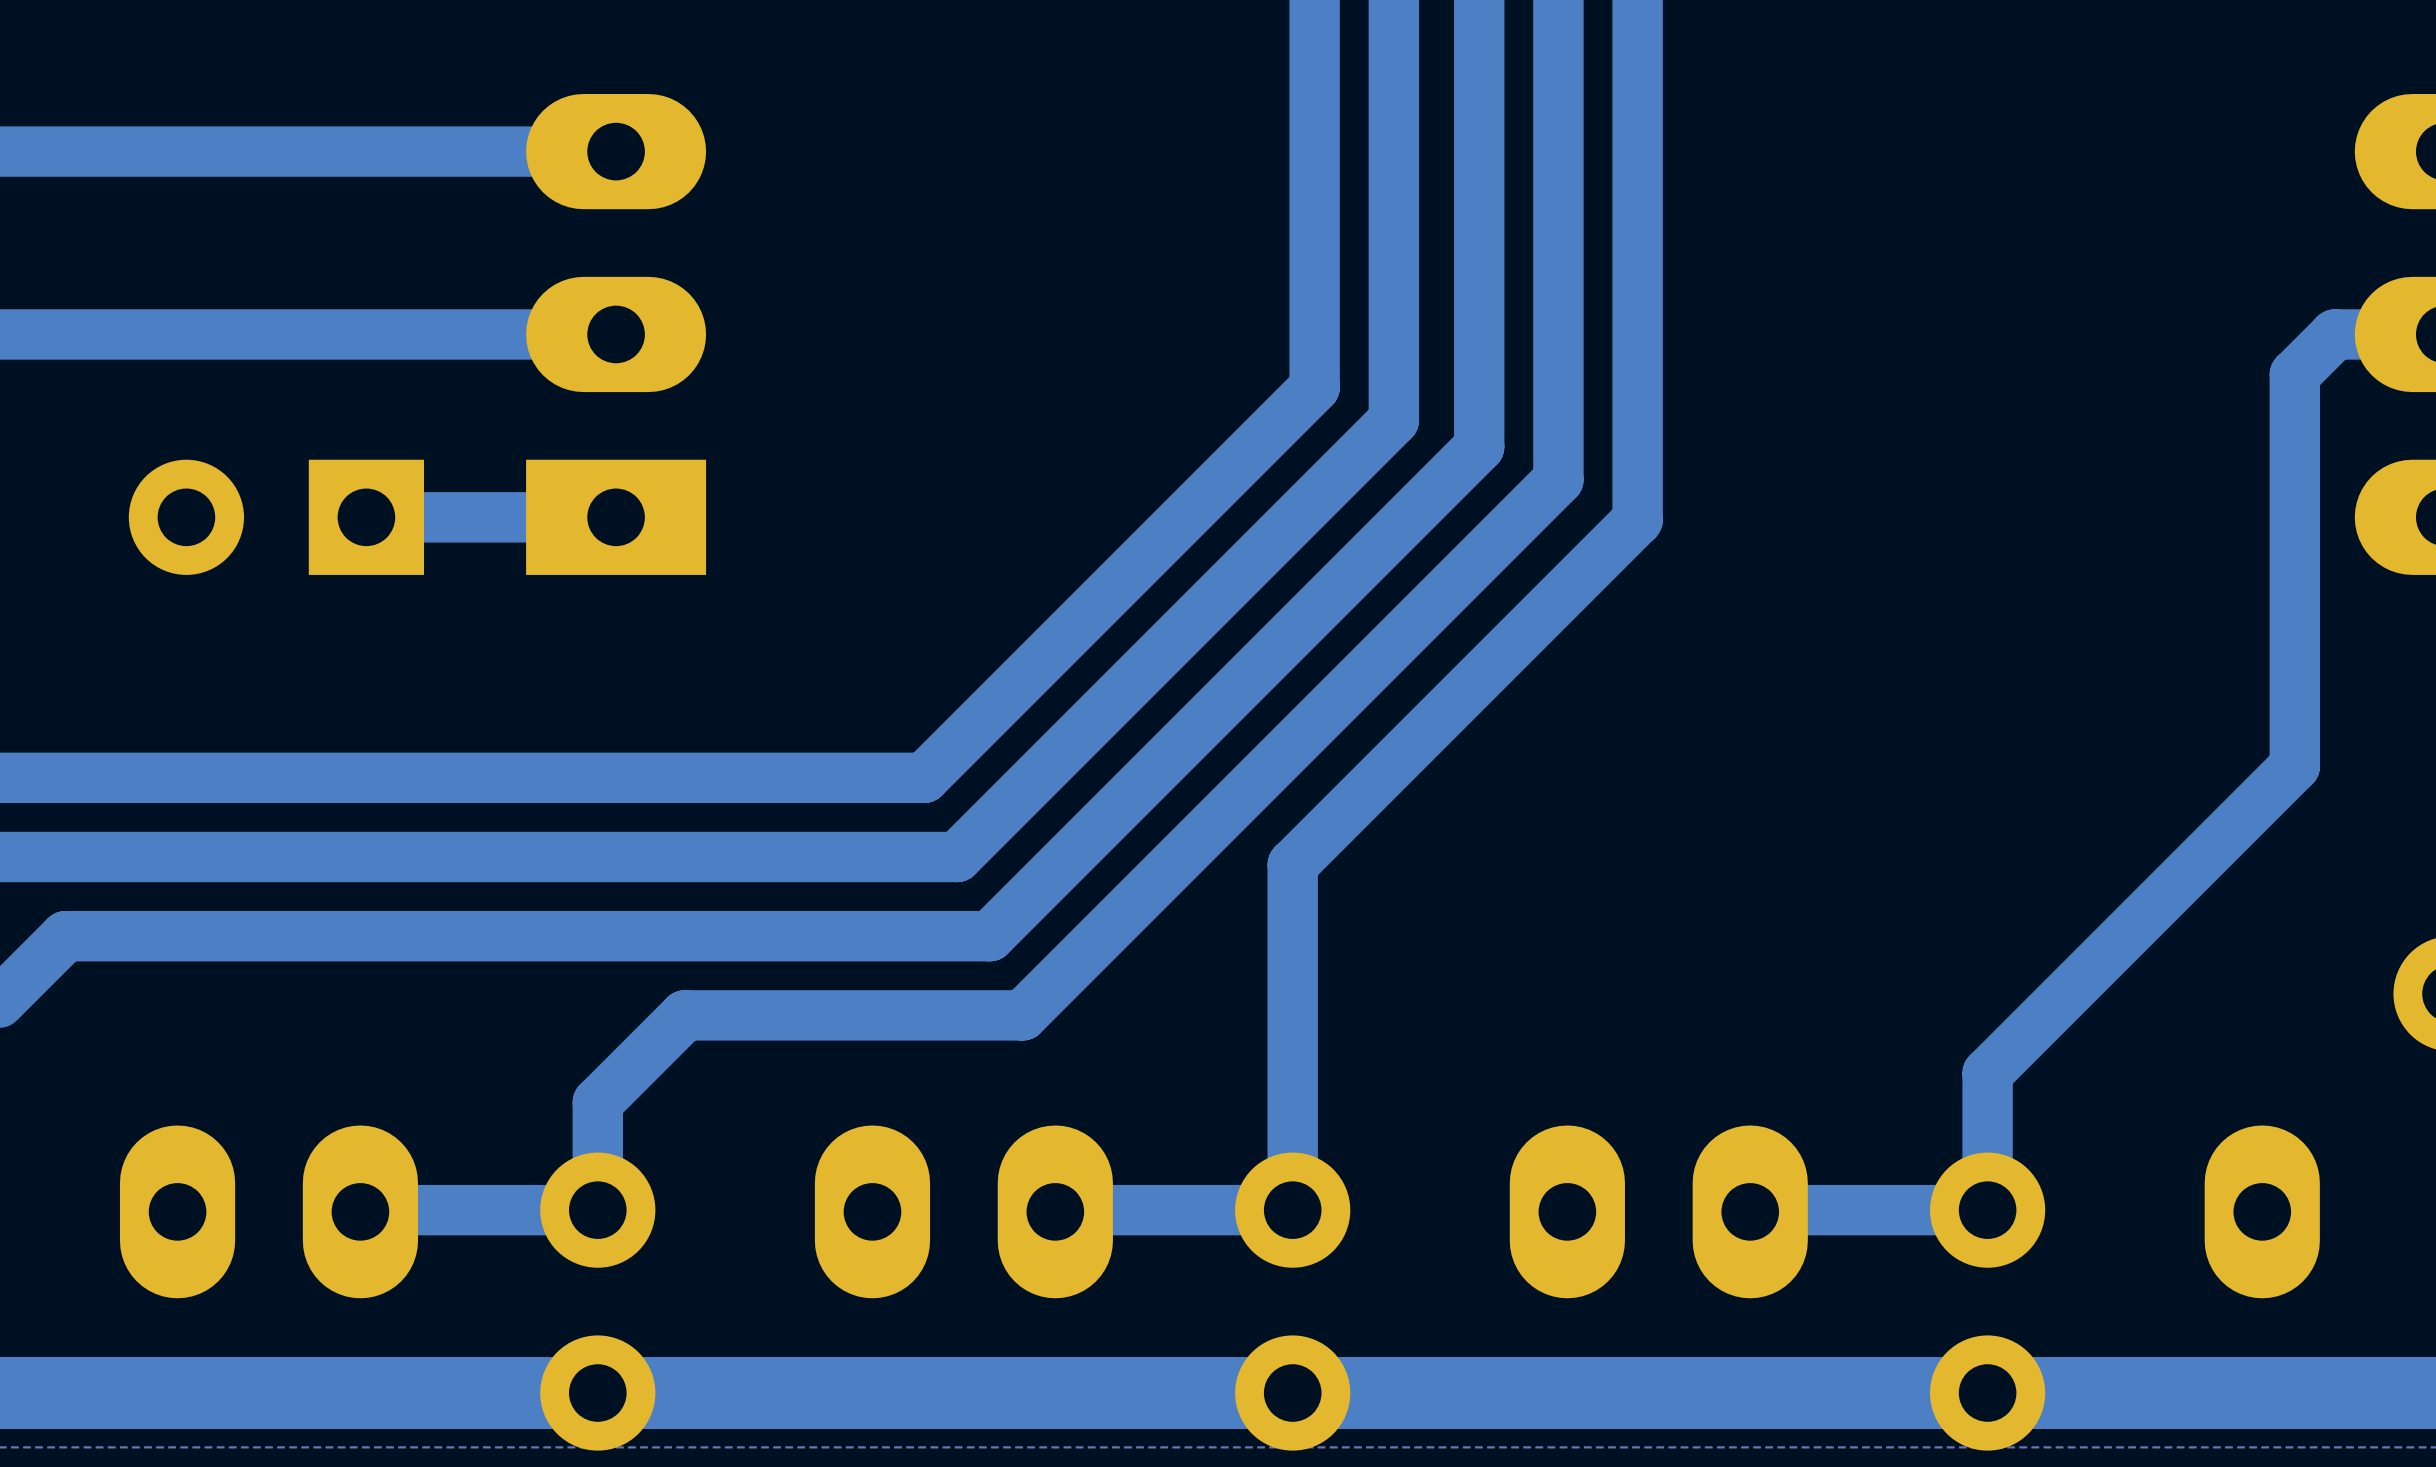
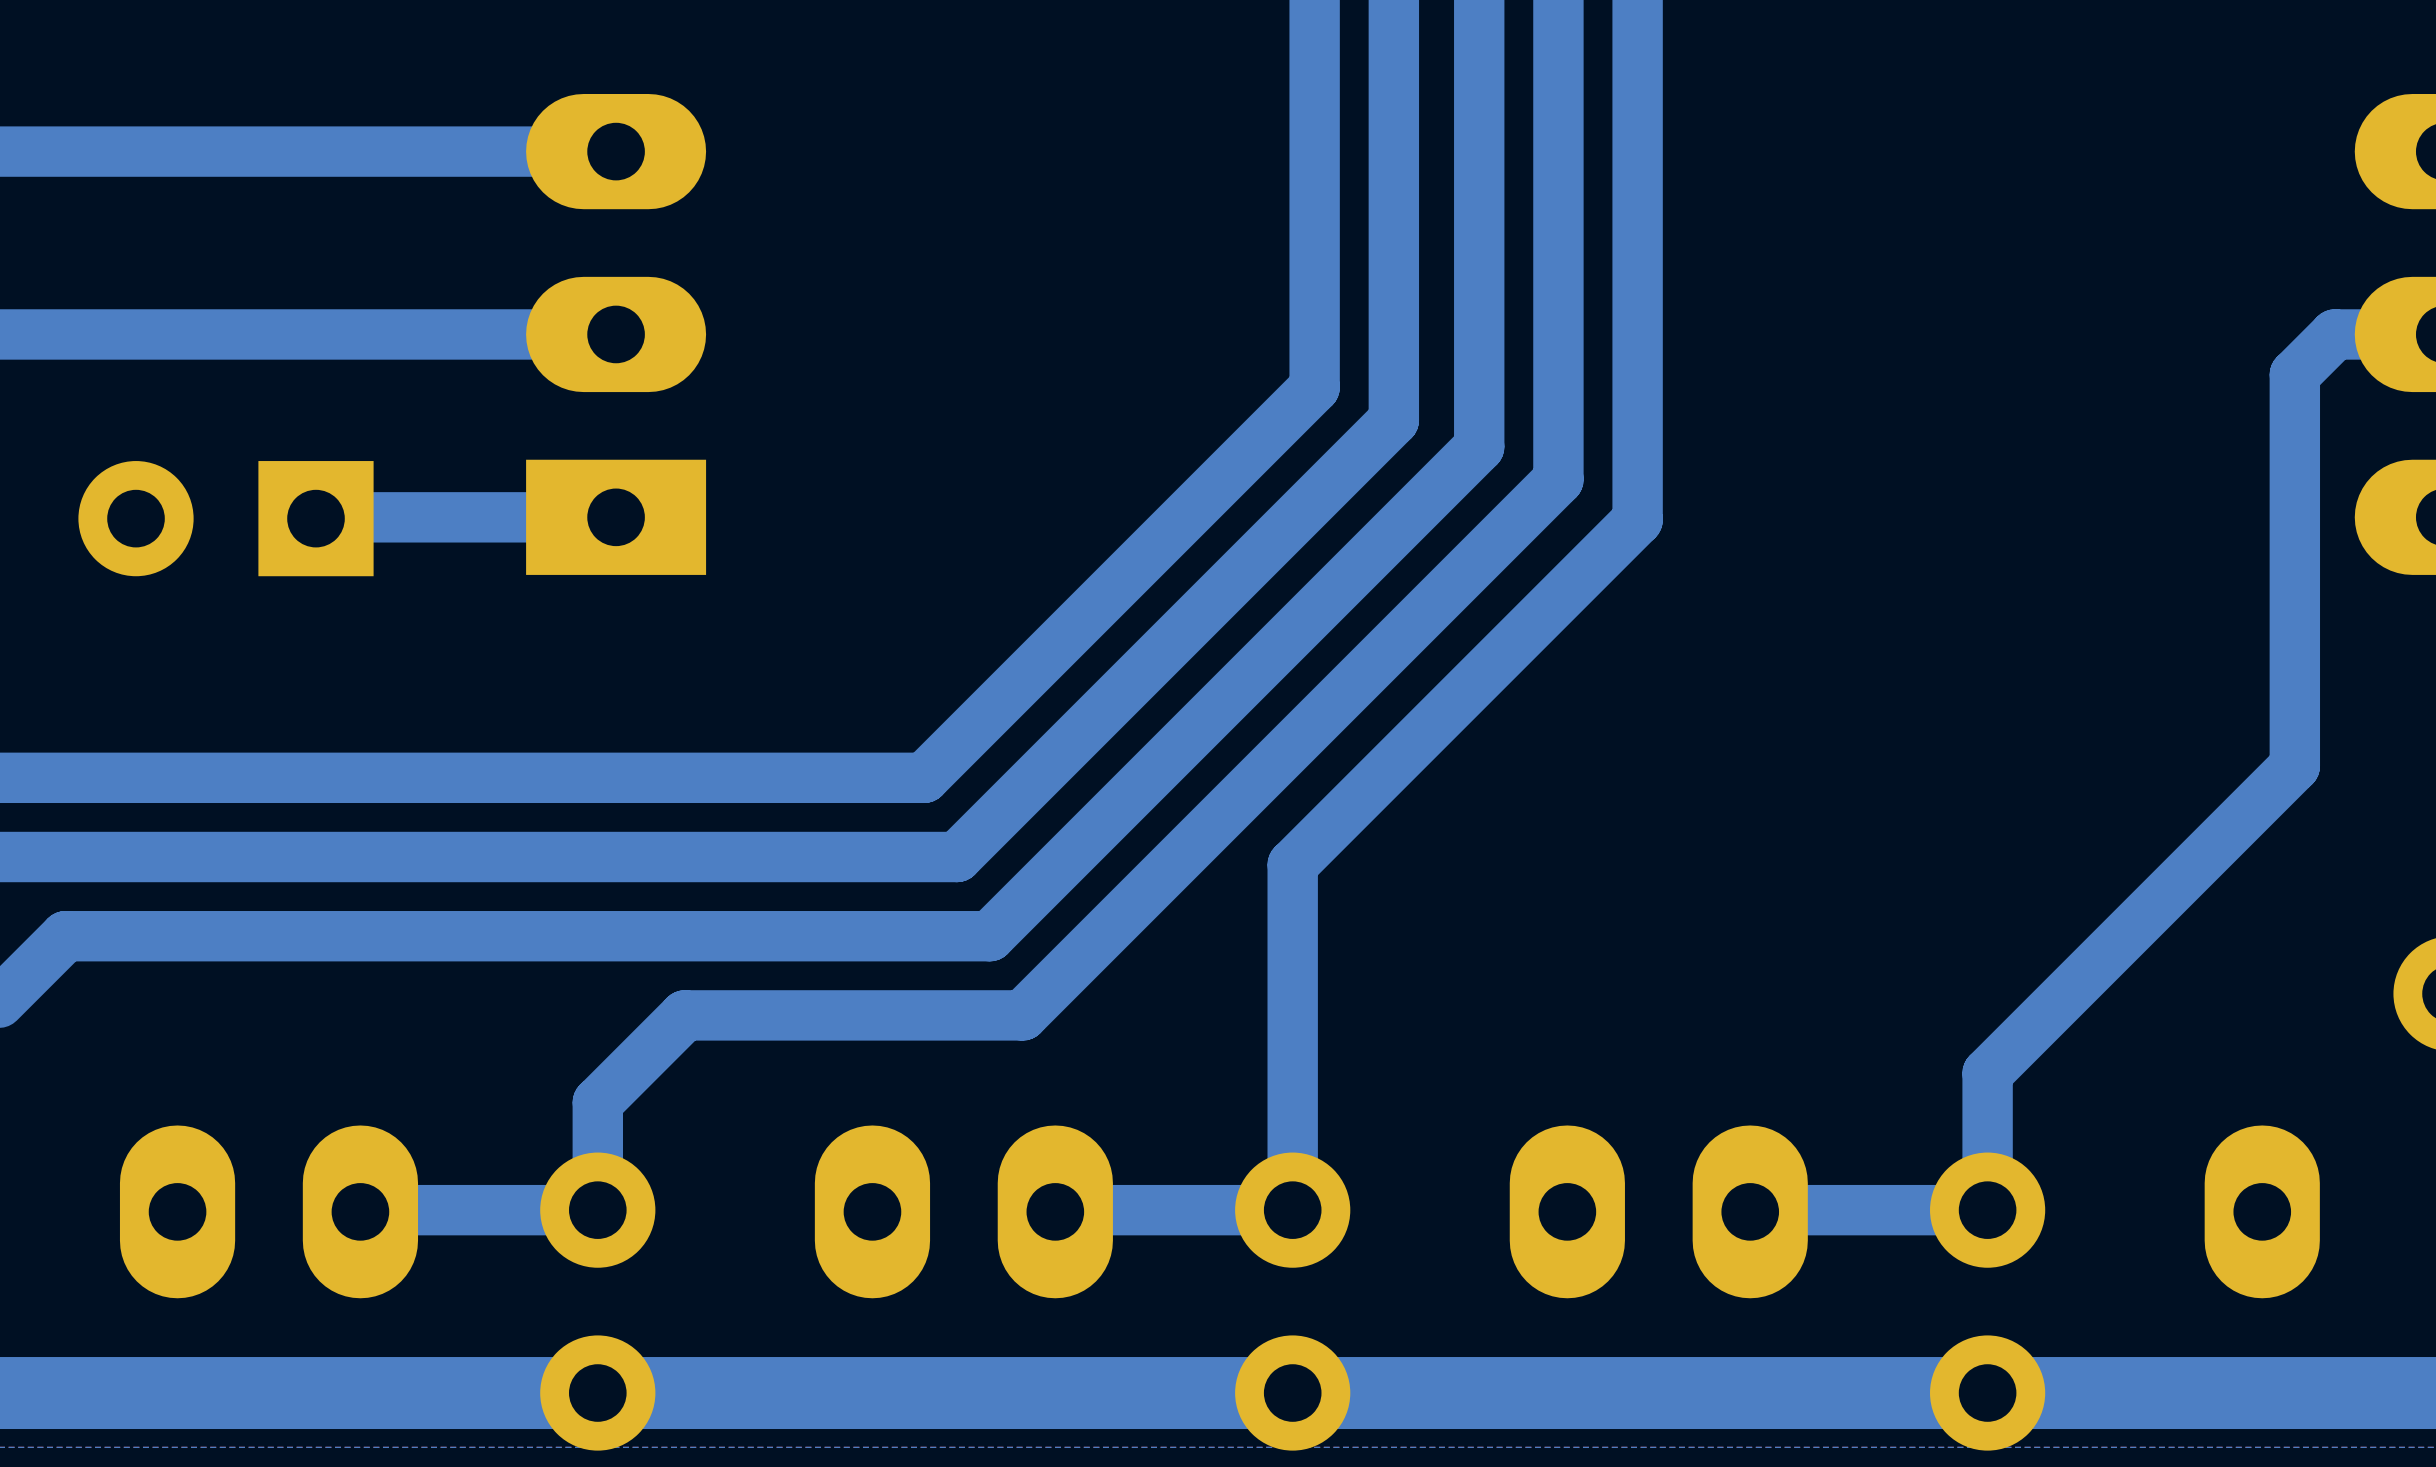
part position: (276, 517) -> (226, 518)

